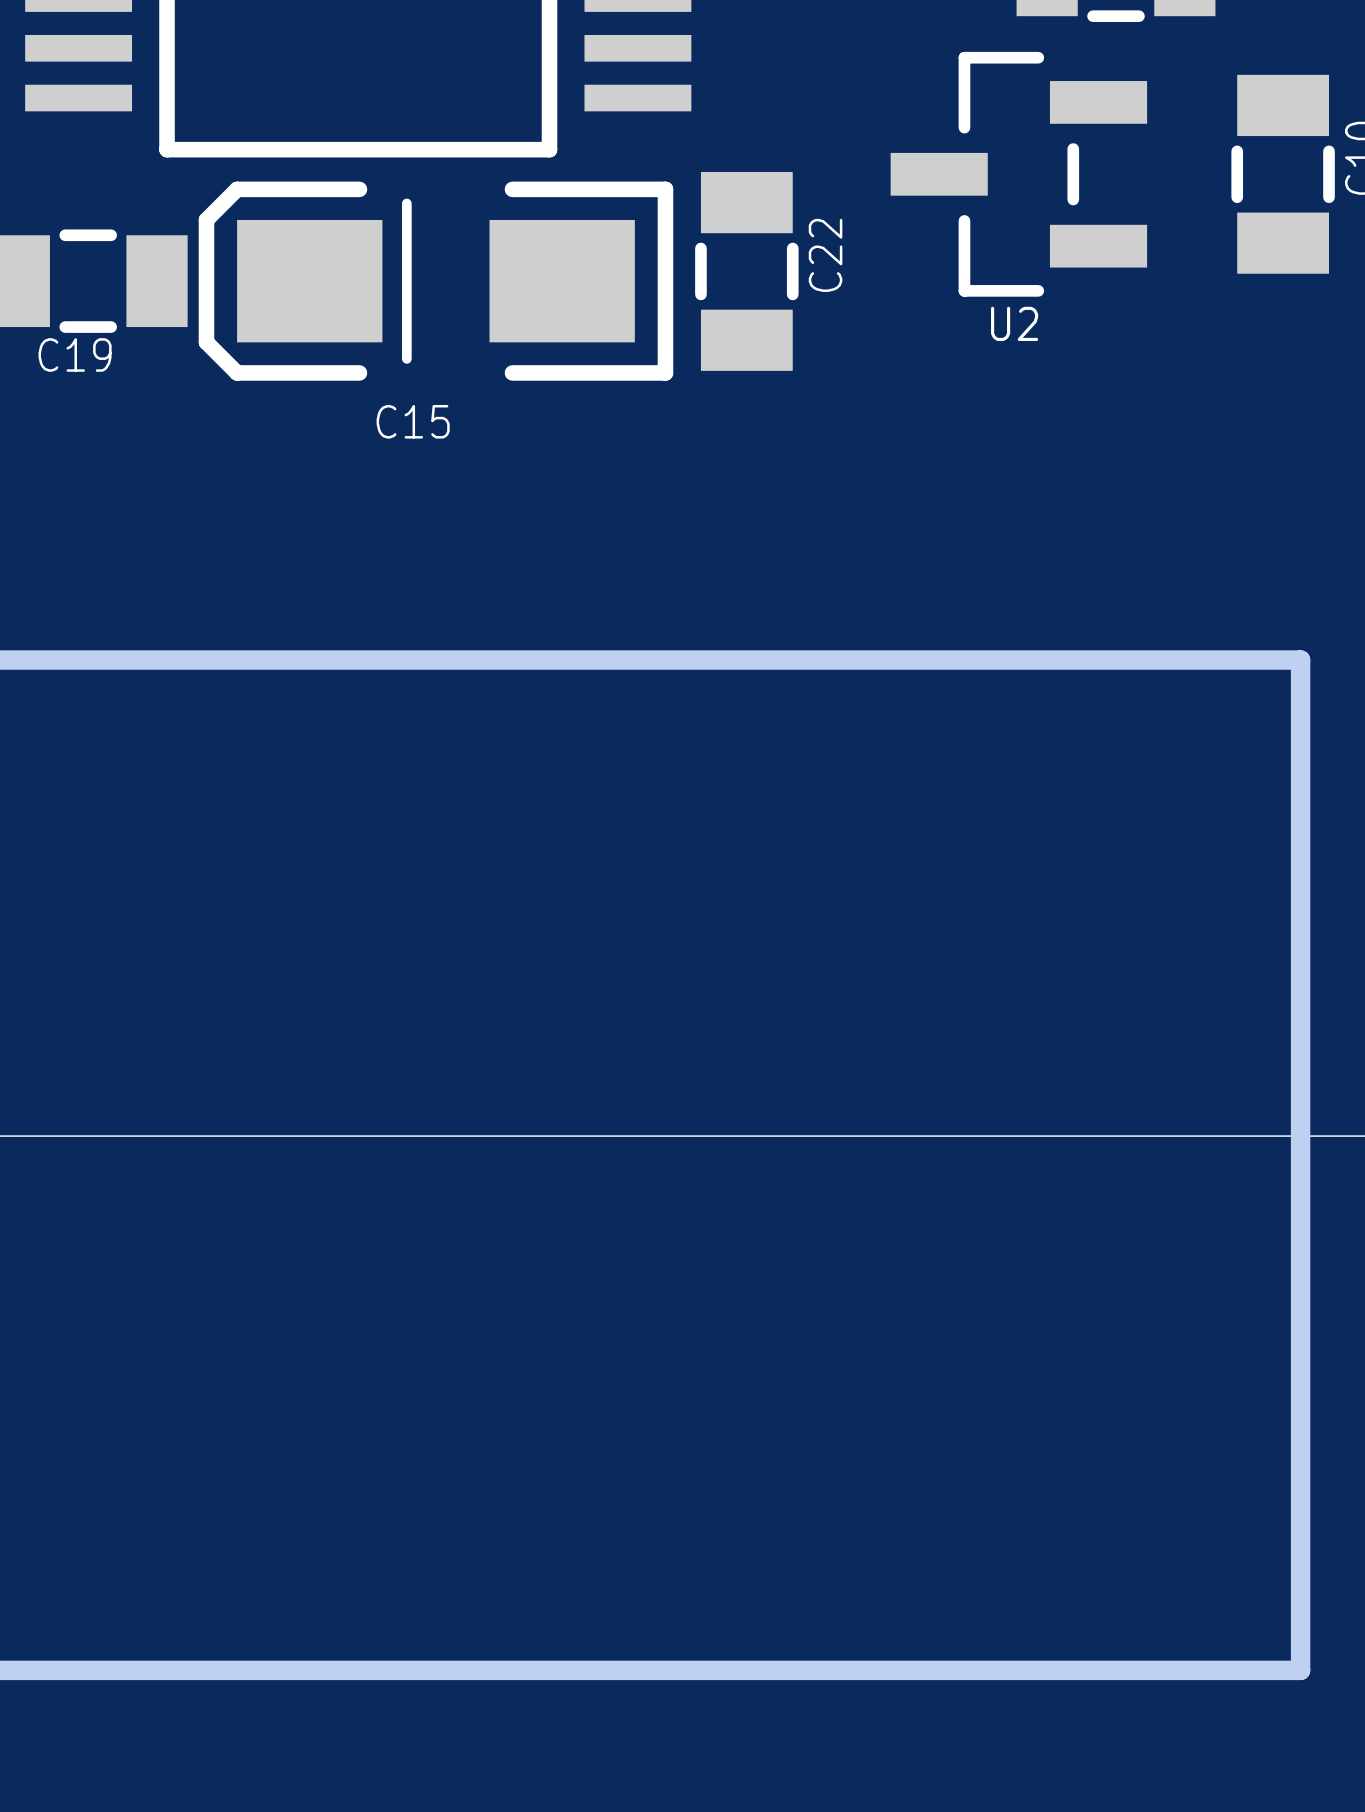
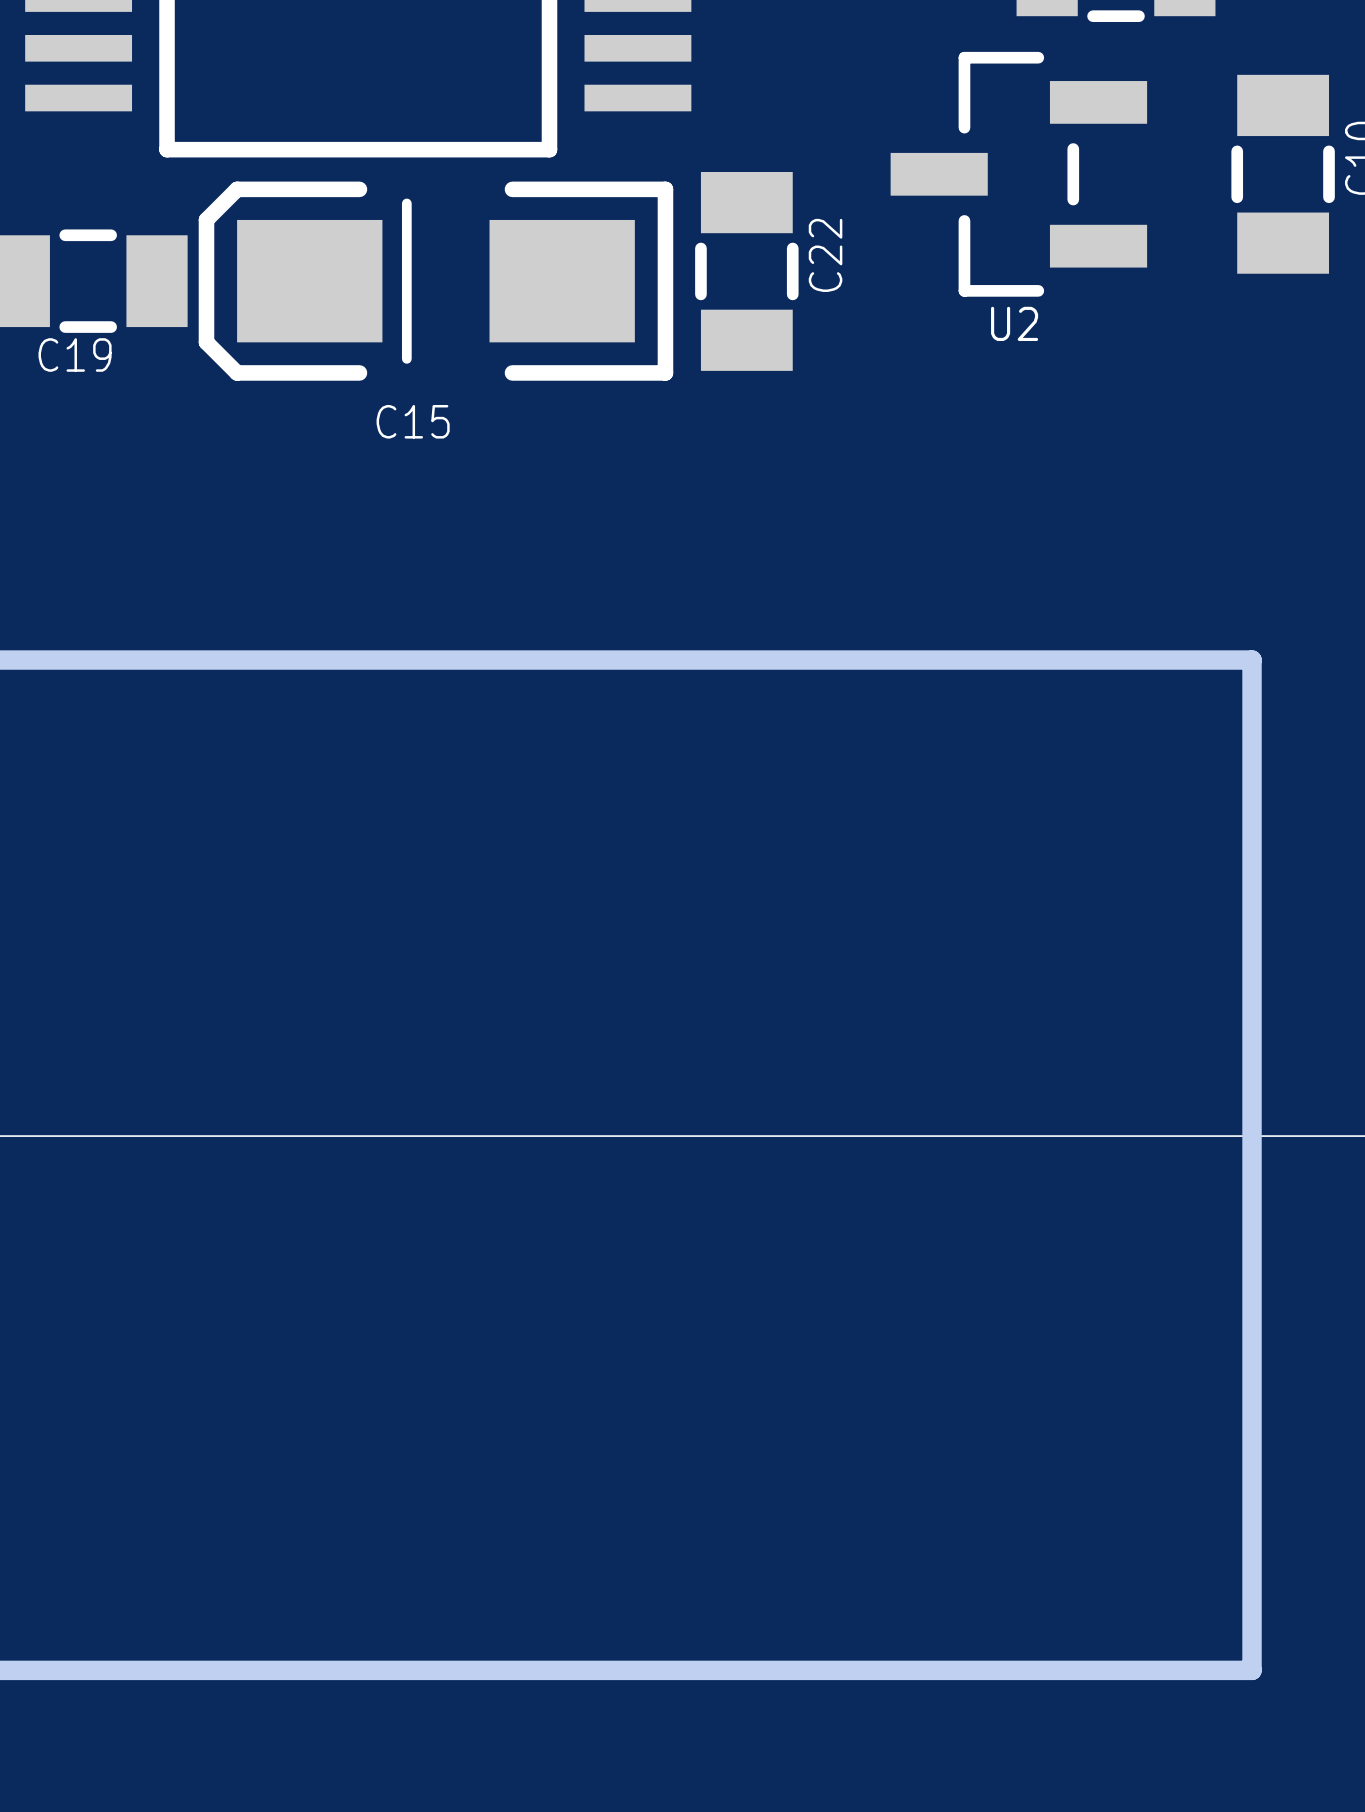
board edge: (1252, 660) (1300, 660) (1300, 1670) (1252, 1670) -> (1252, 660) (1252, 1670)

